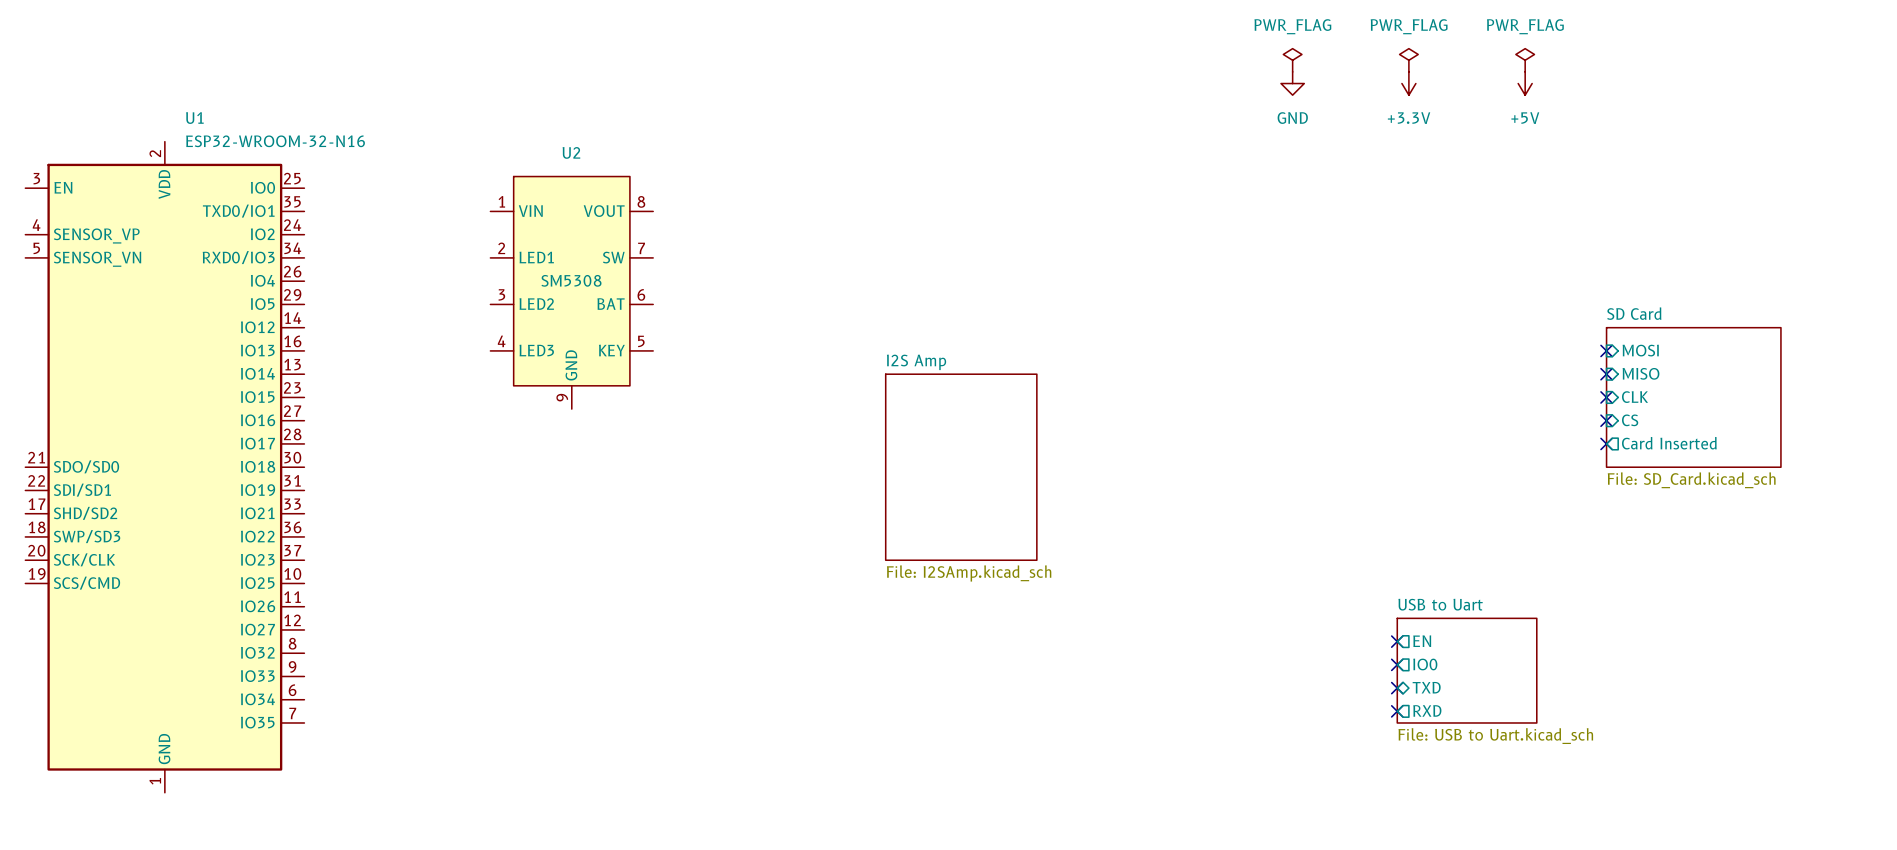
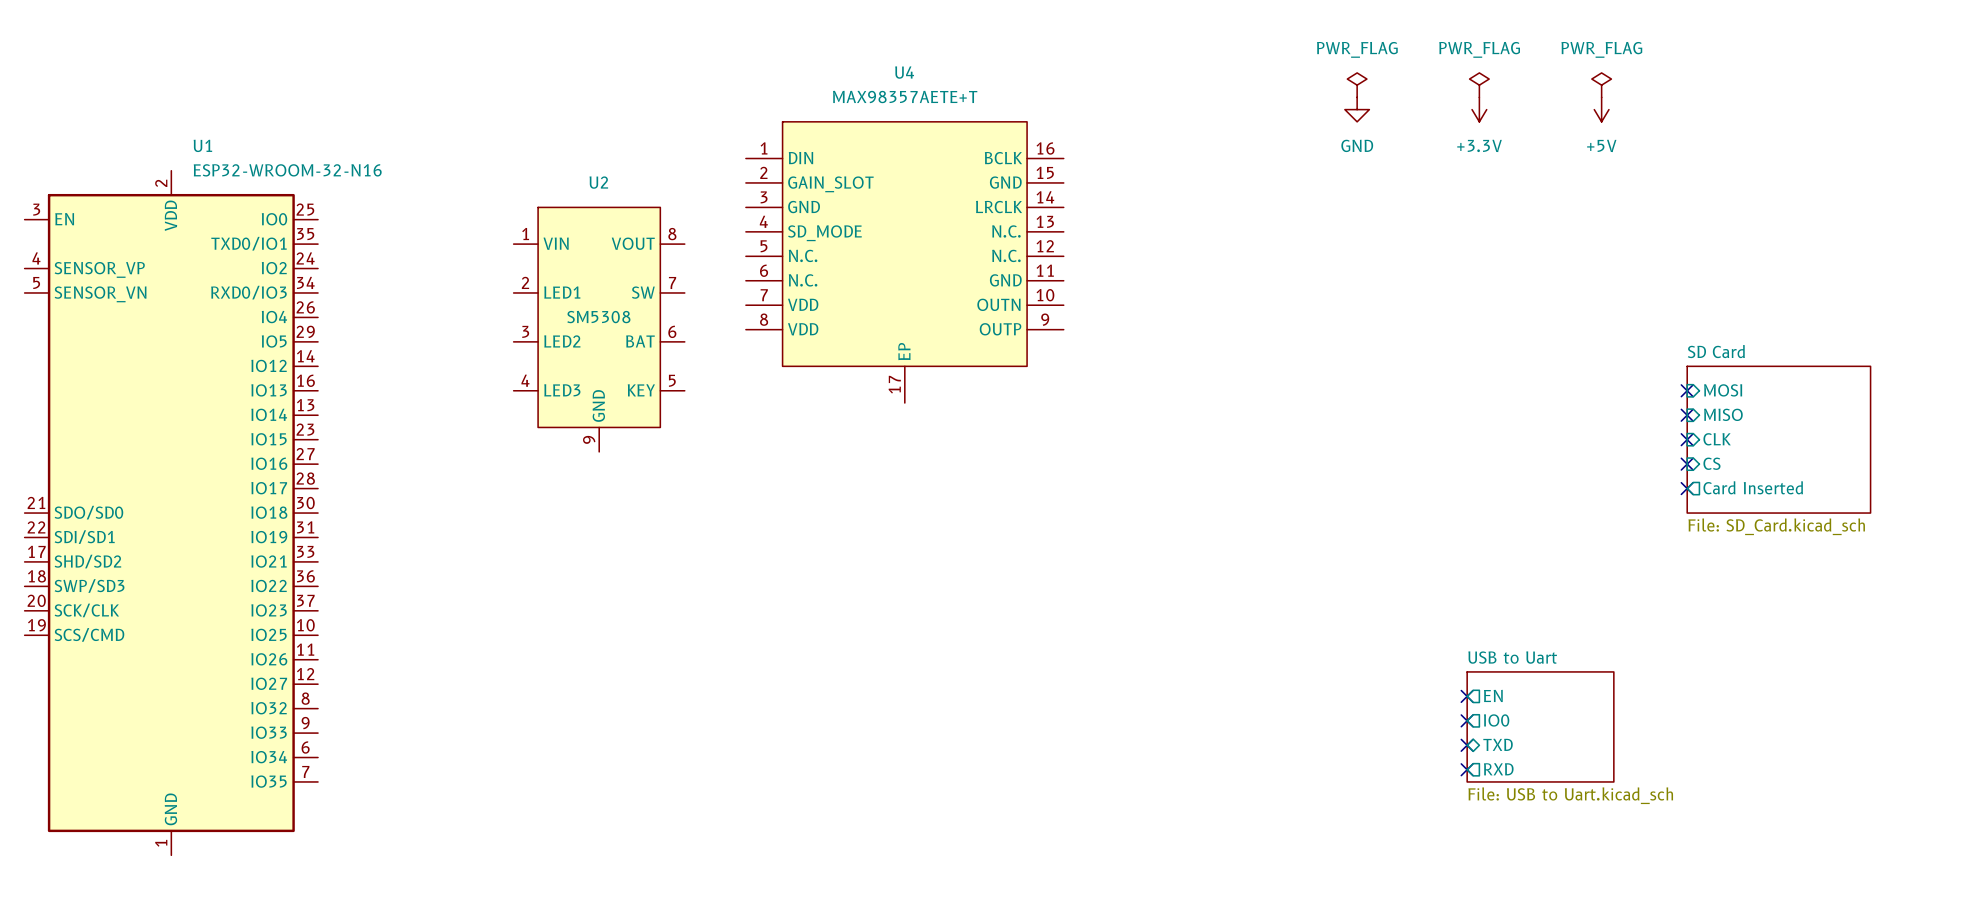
U4: none -> MAX98357AETE+T (904, 262)
sheet I2S Amp: File: I2SAmp.kicad_sch (961, 467) -> none

